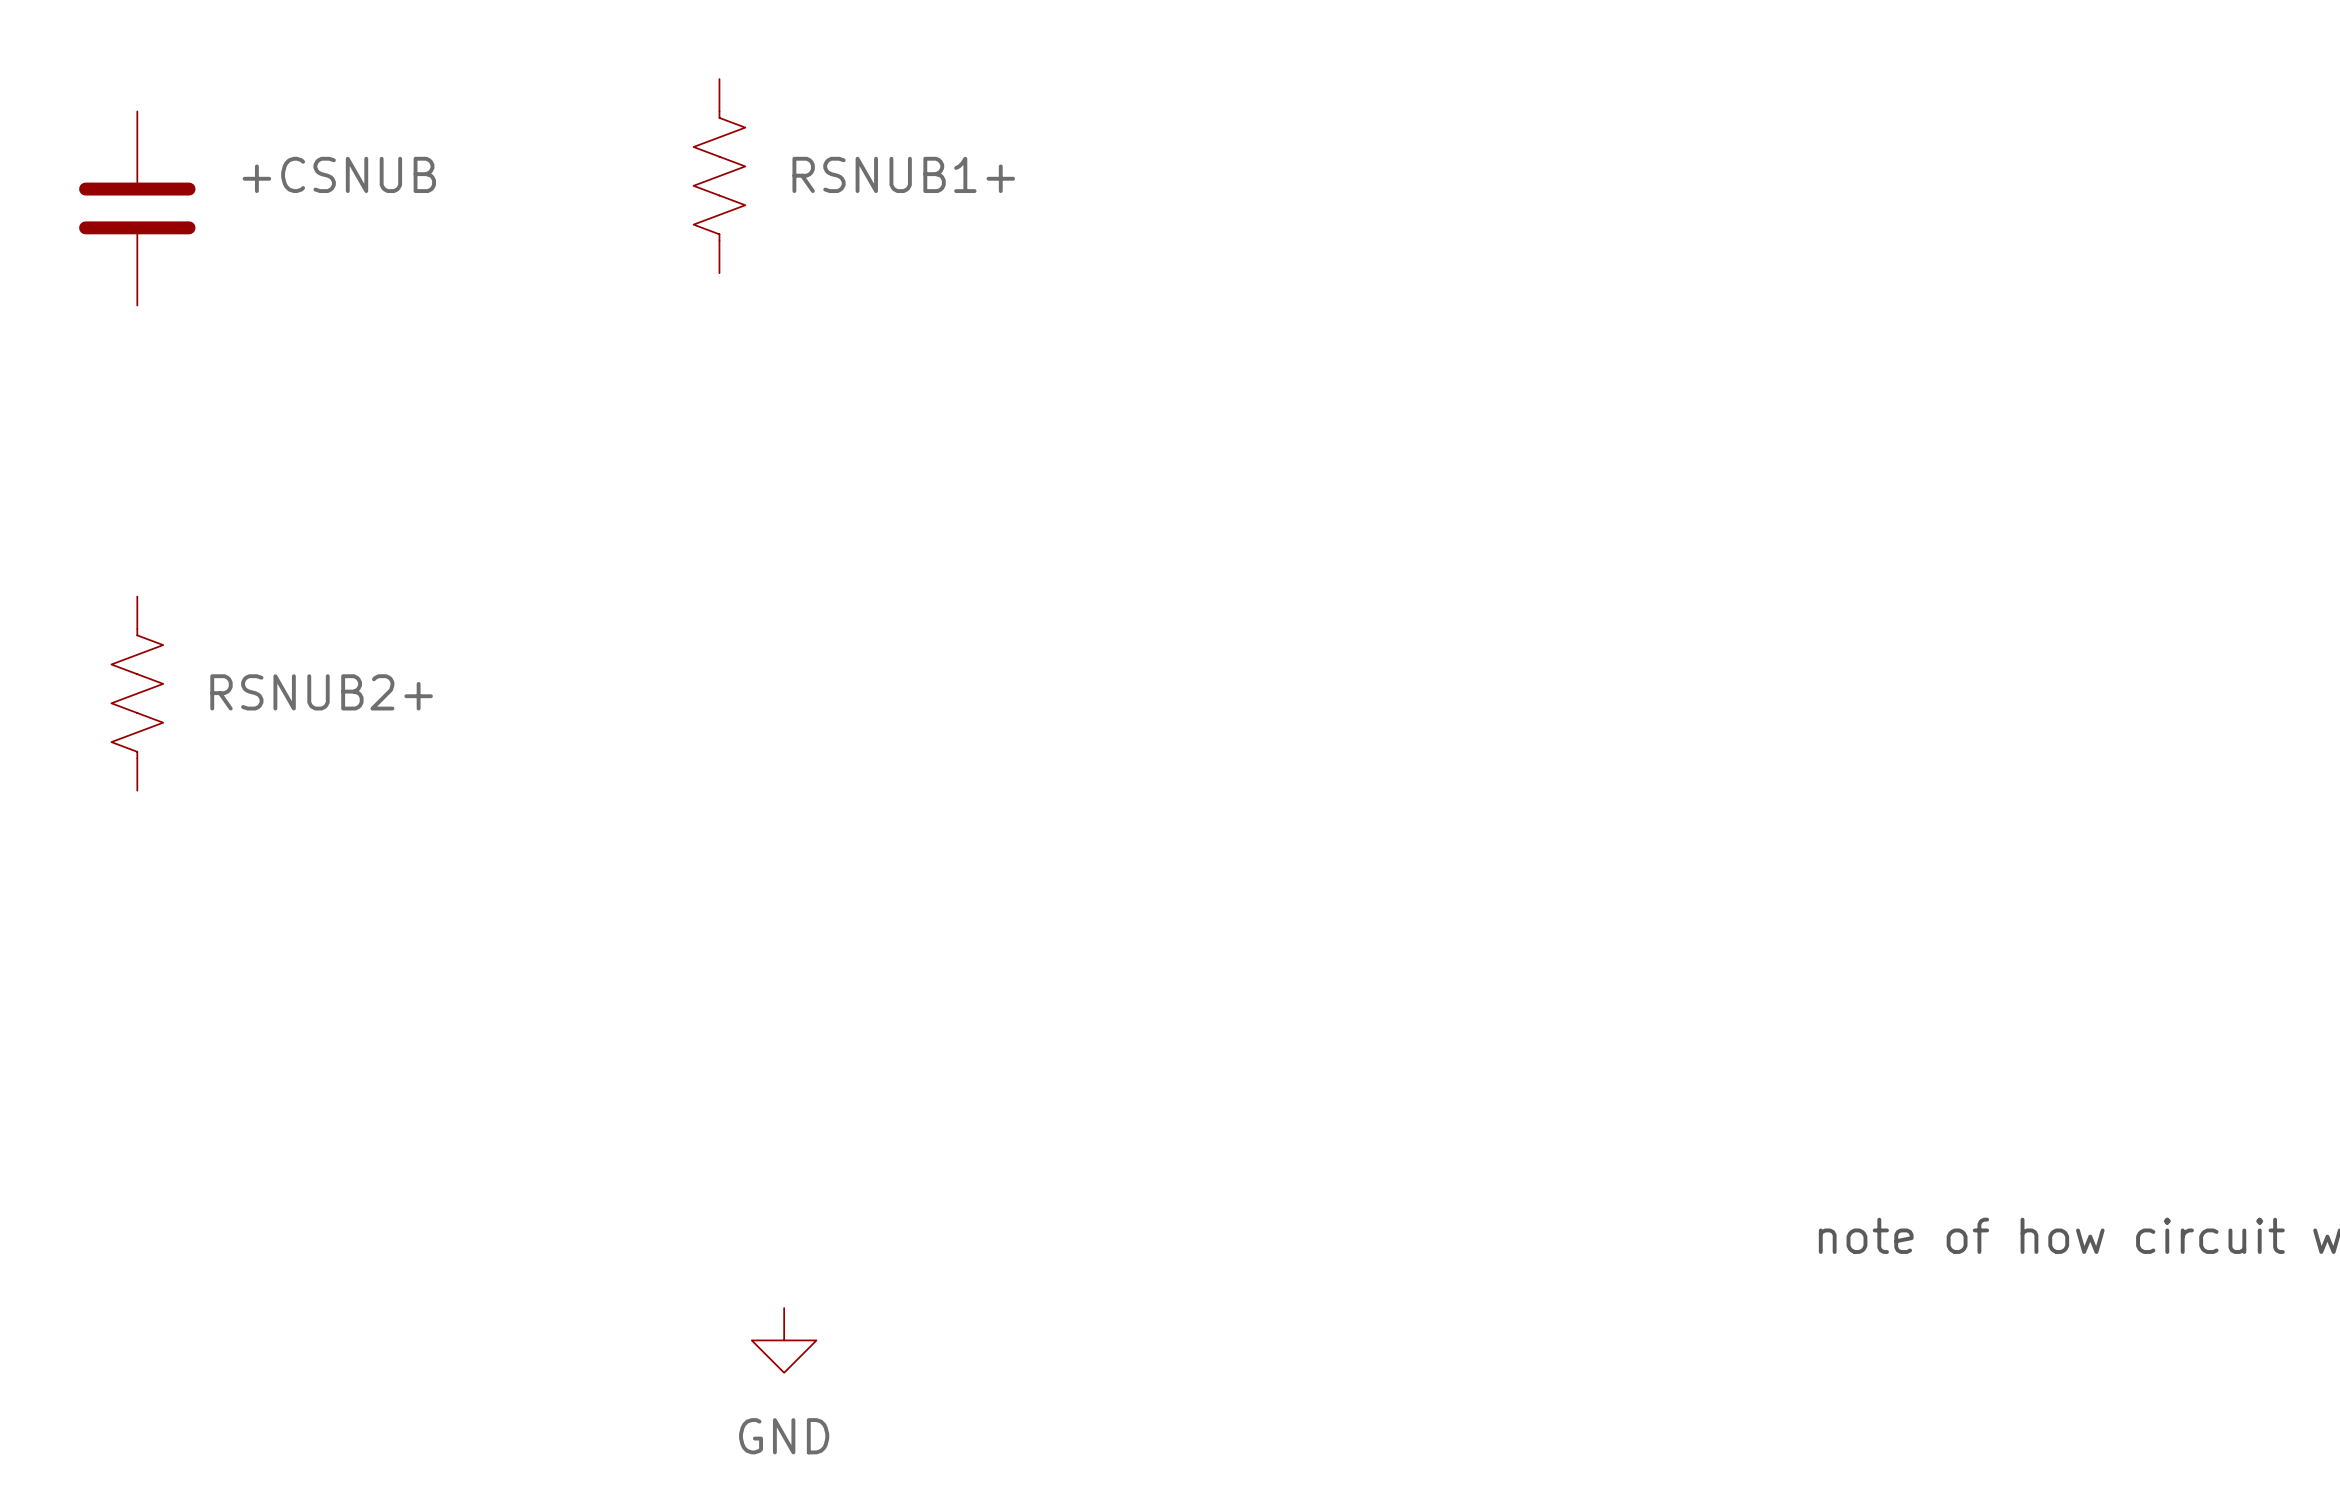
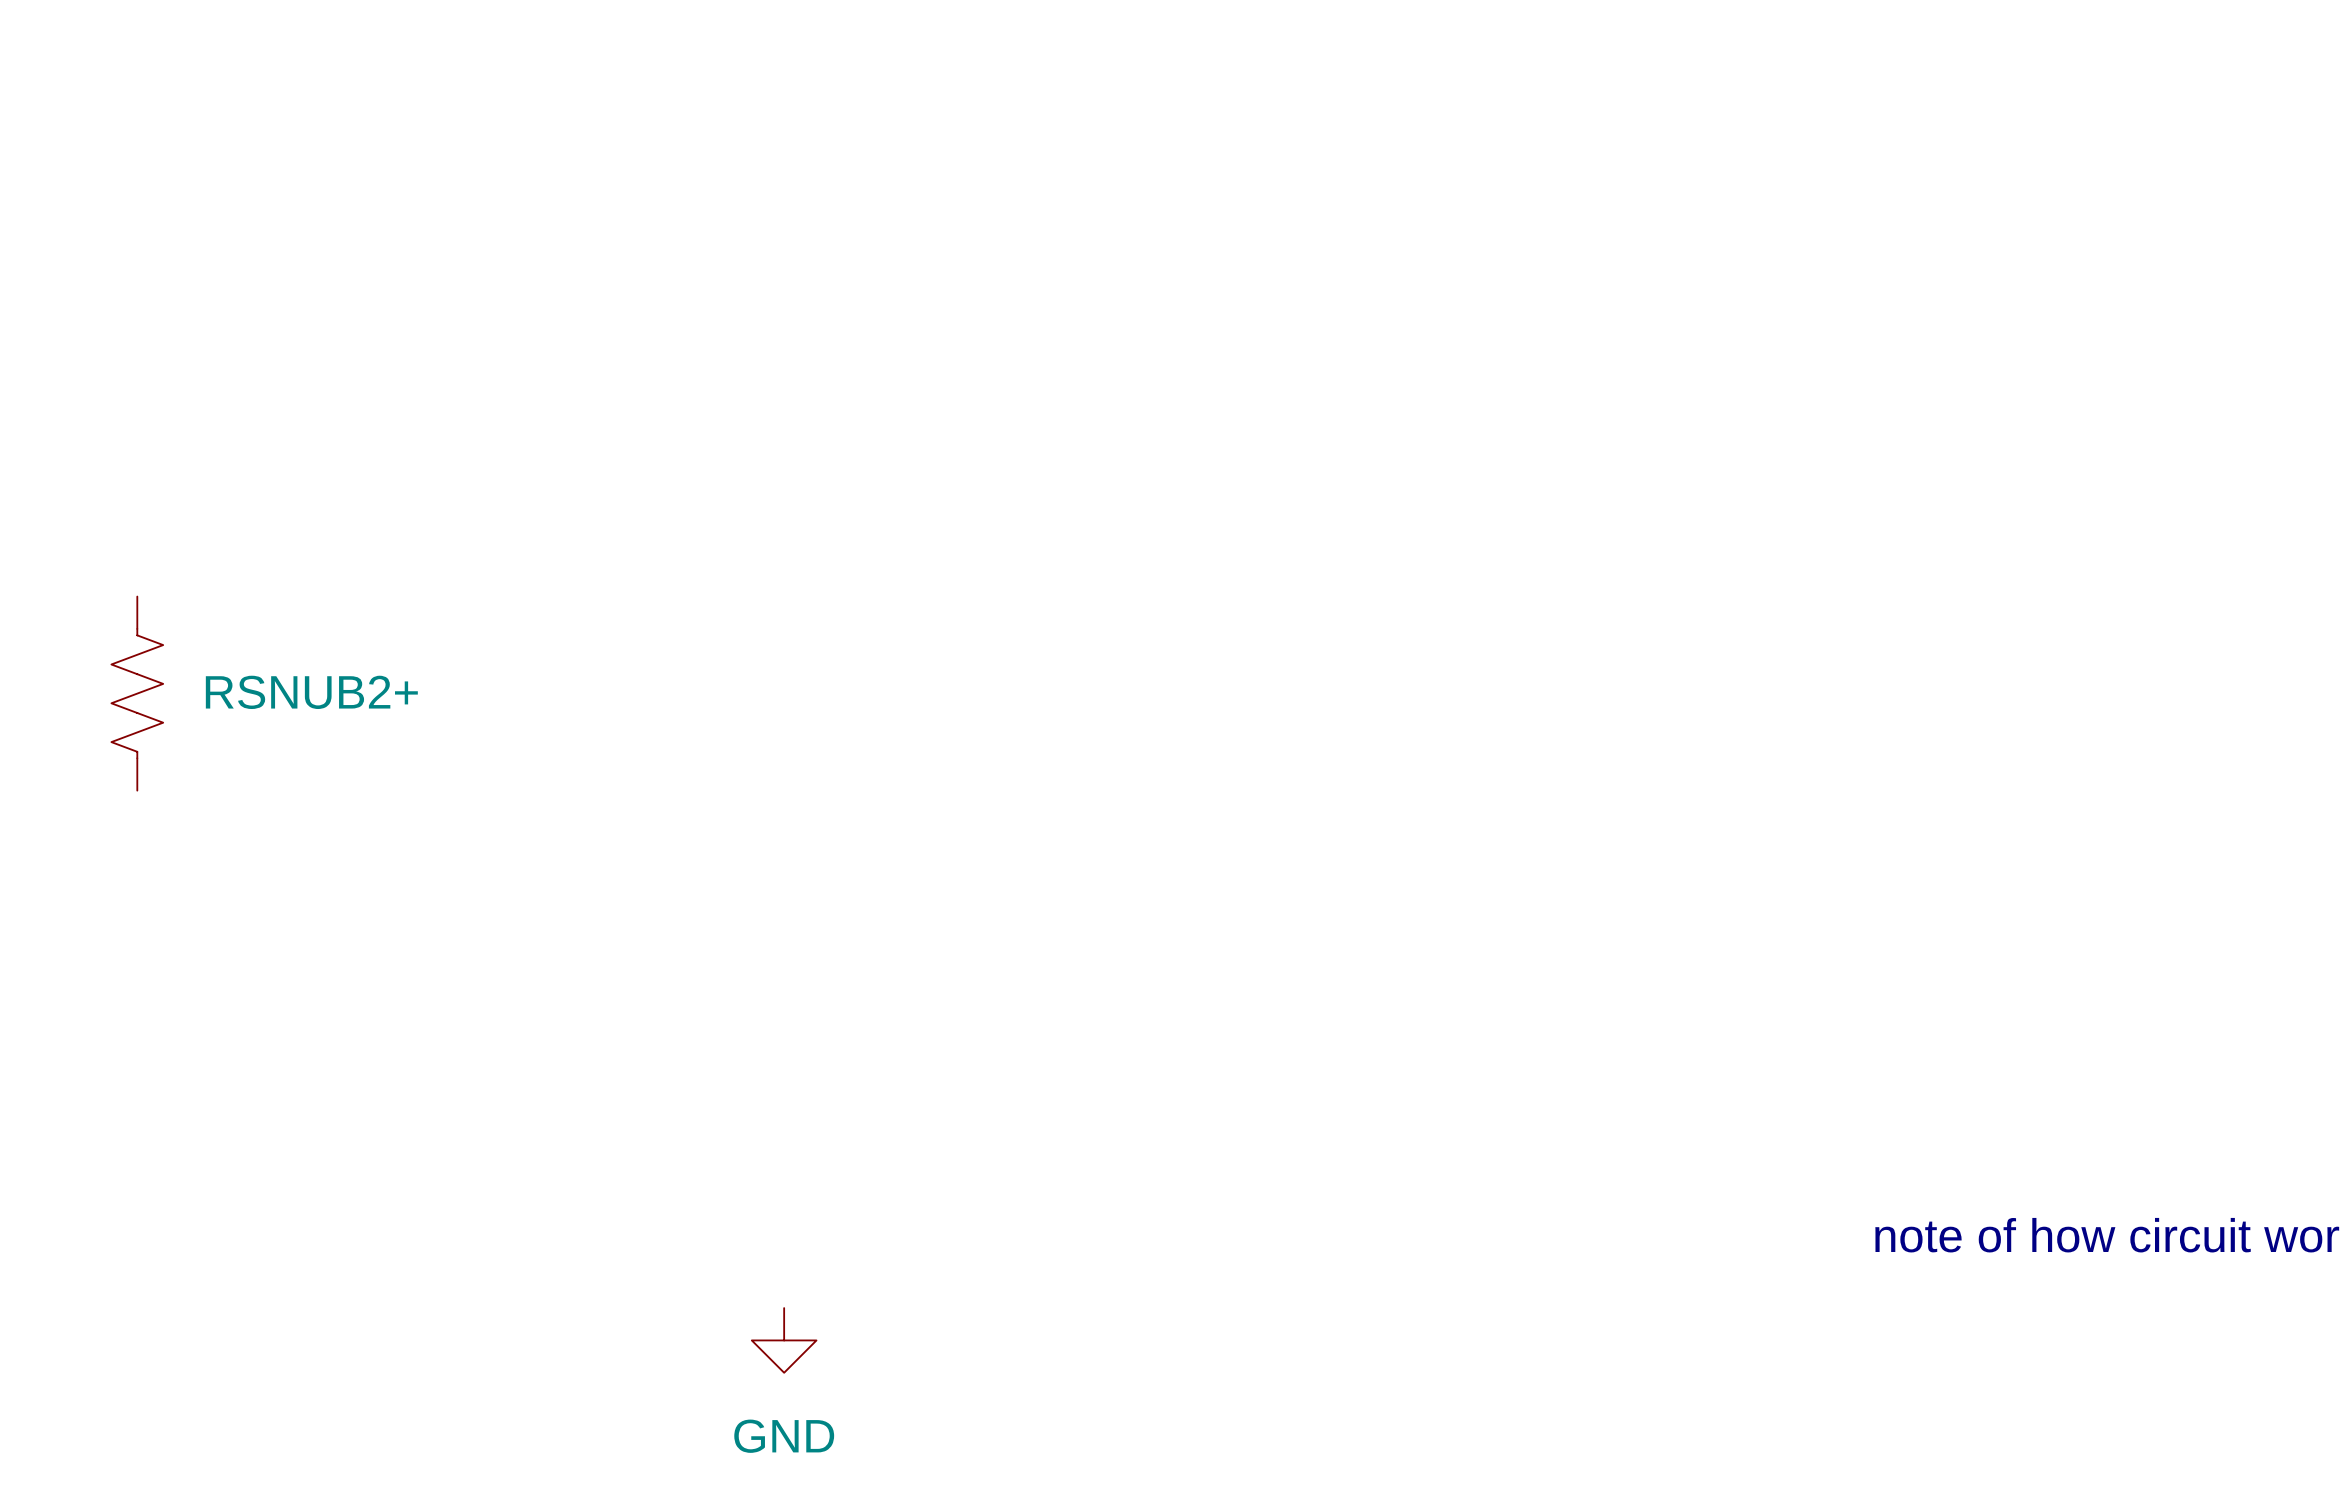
part: RSNUB1+ (719, 176) -> none
+CSNUB: (137, 208) -> none

